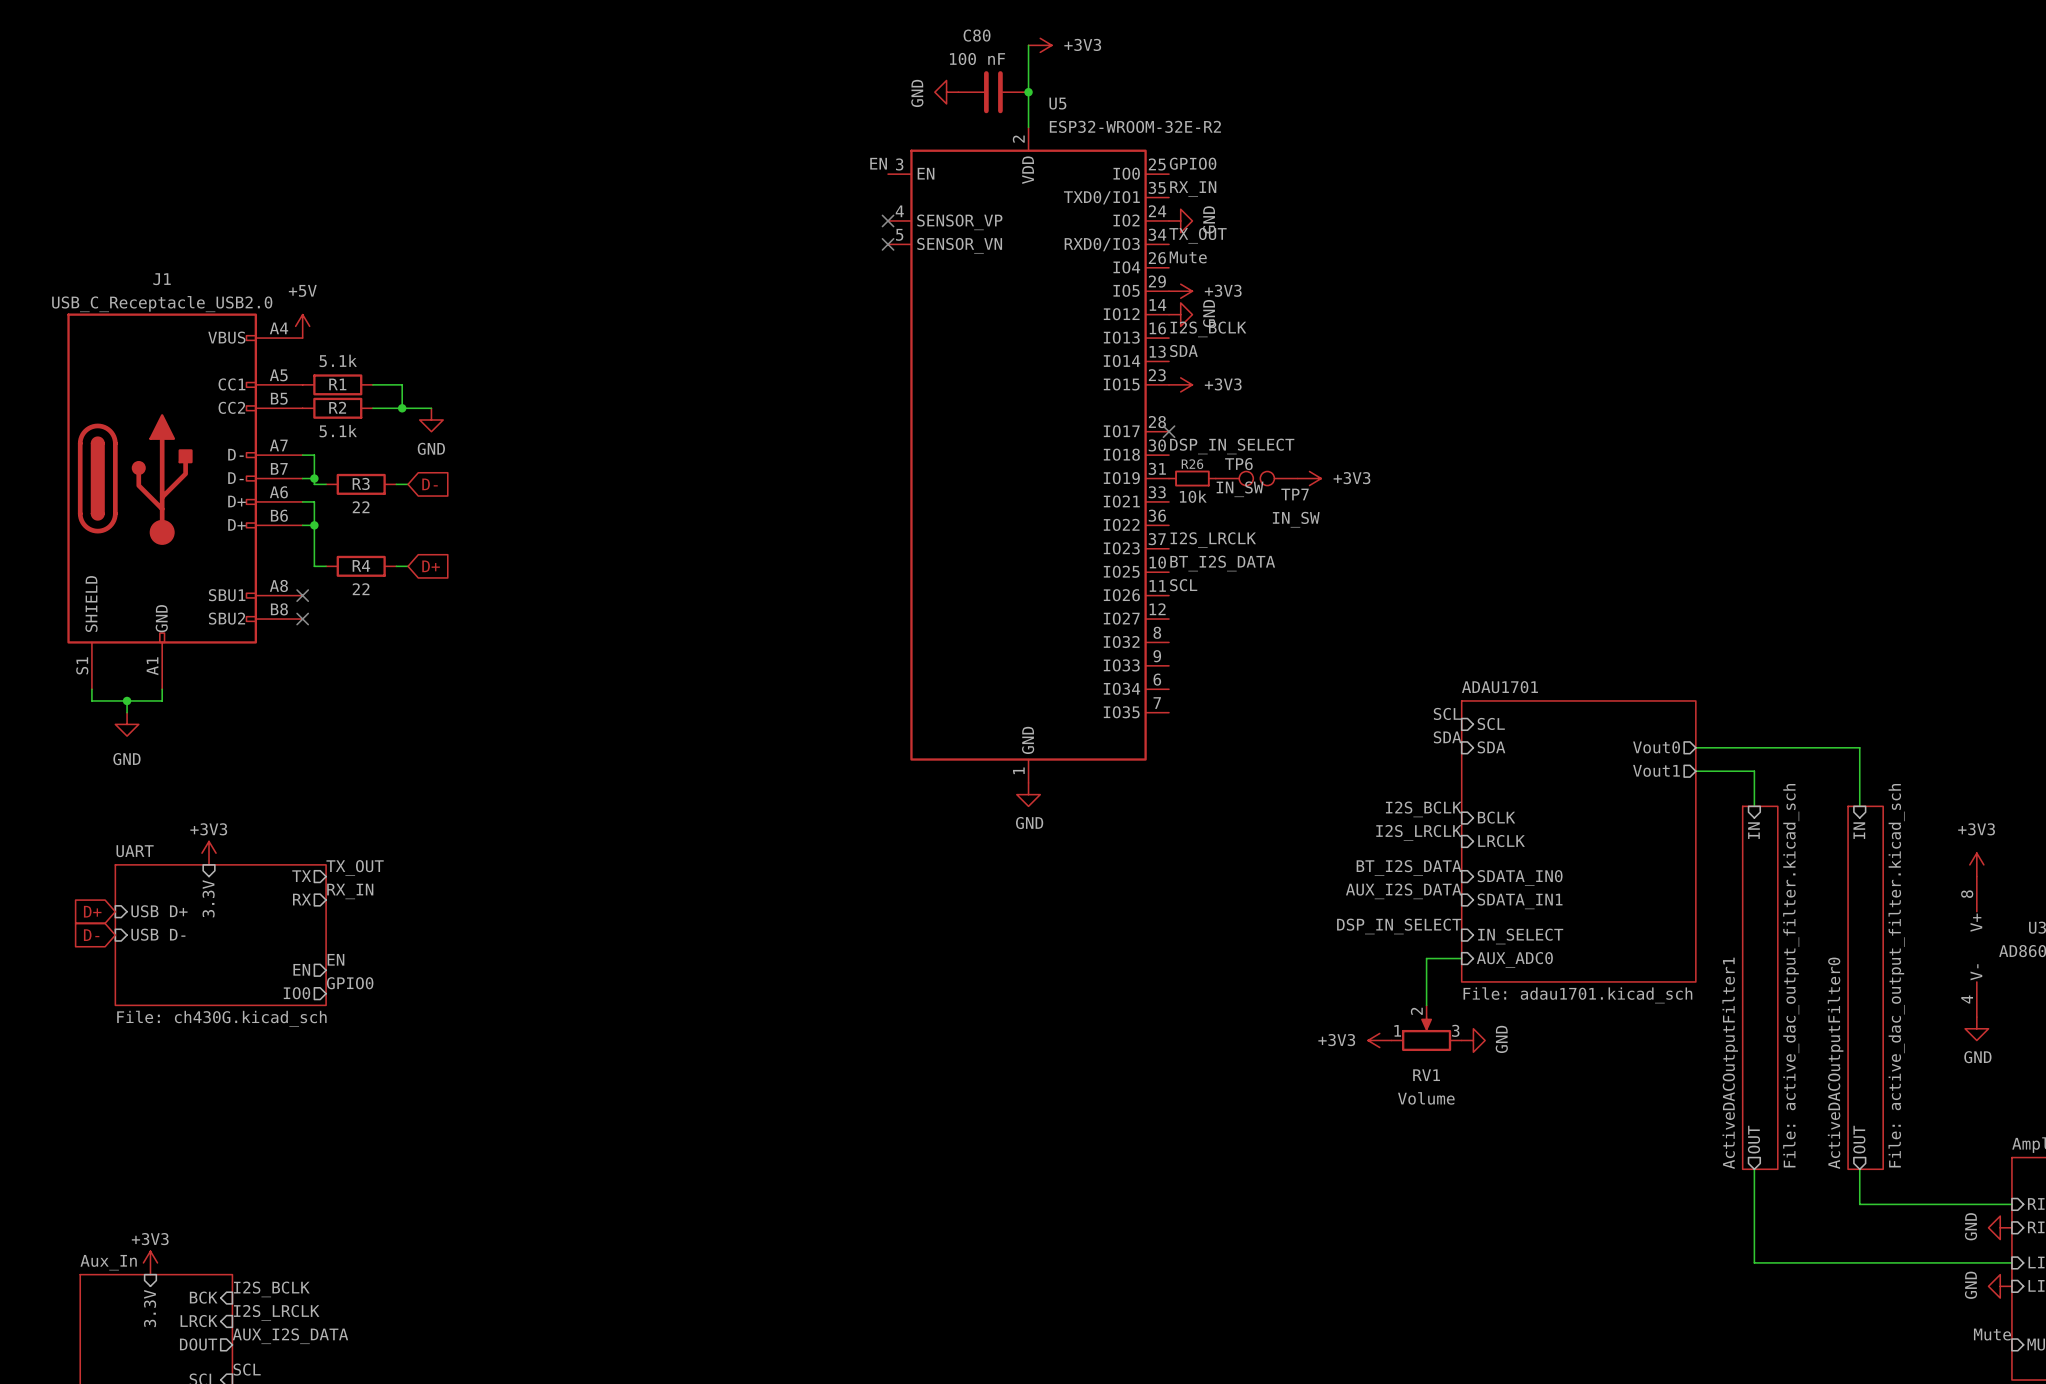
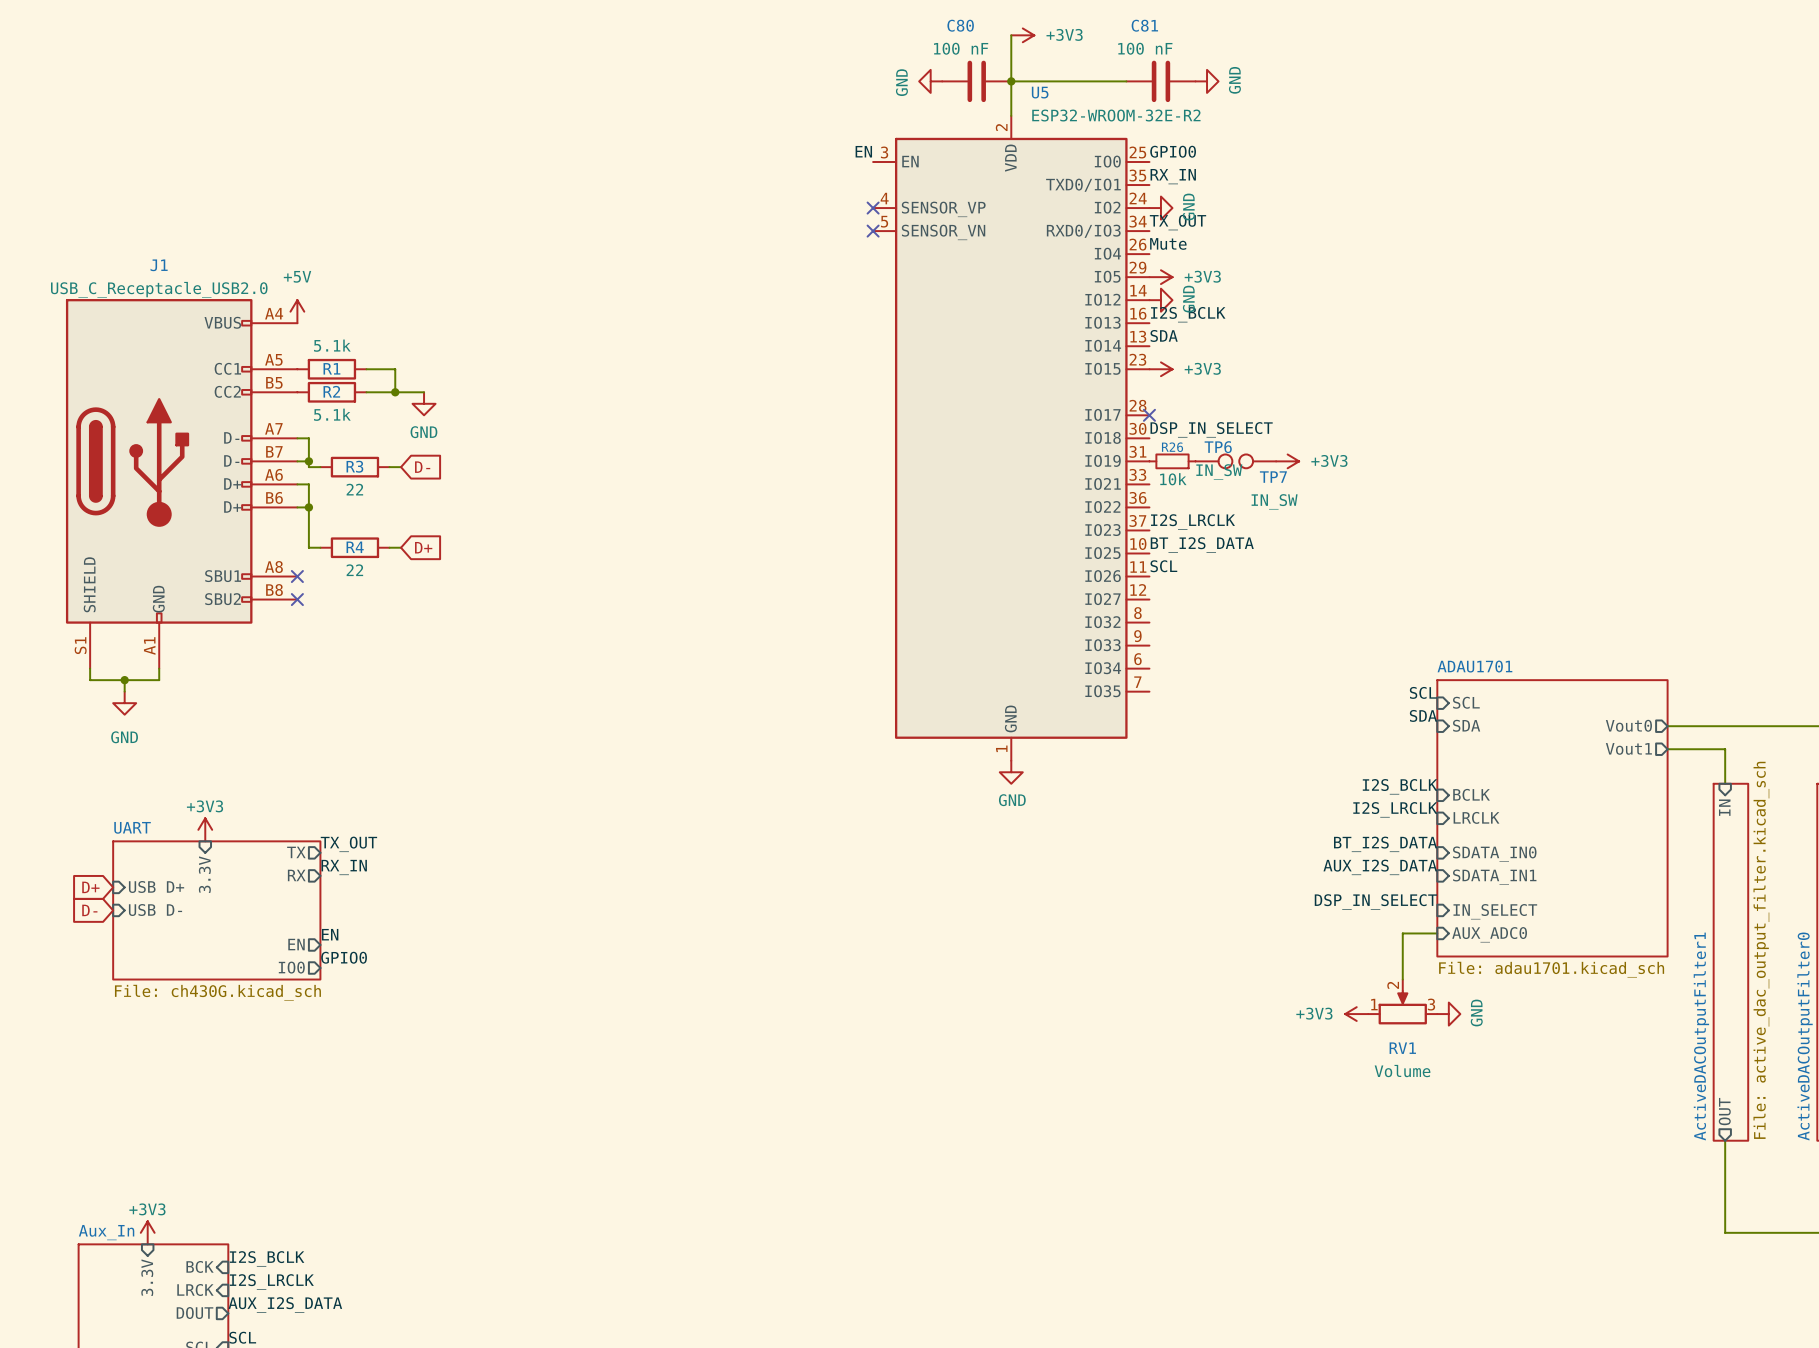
wire: none -> (1011, 81) (1126, 81)
C81: none -> 100 nF (1160, 81)
power symbol: none -> GND (1207, 81)

